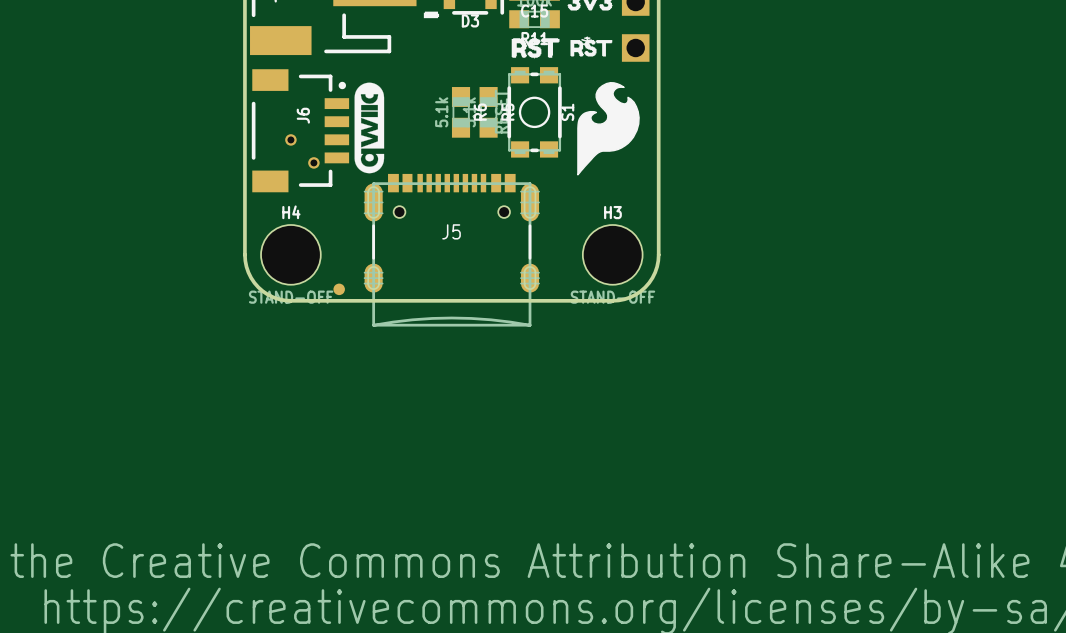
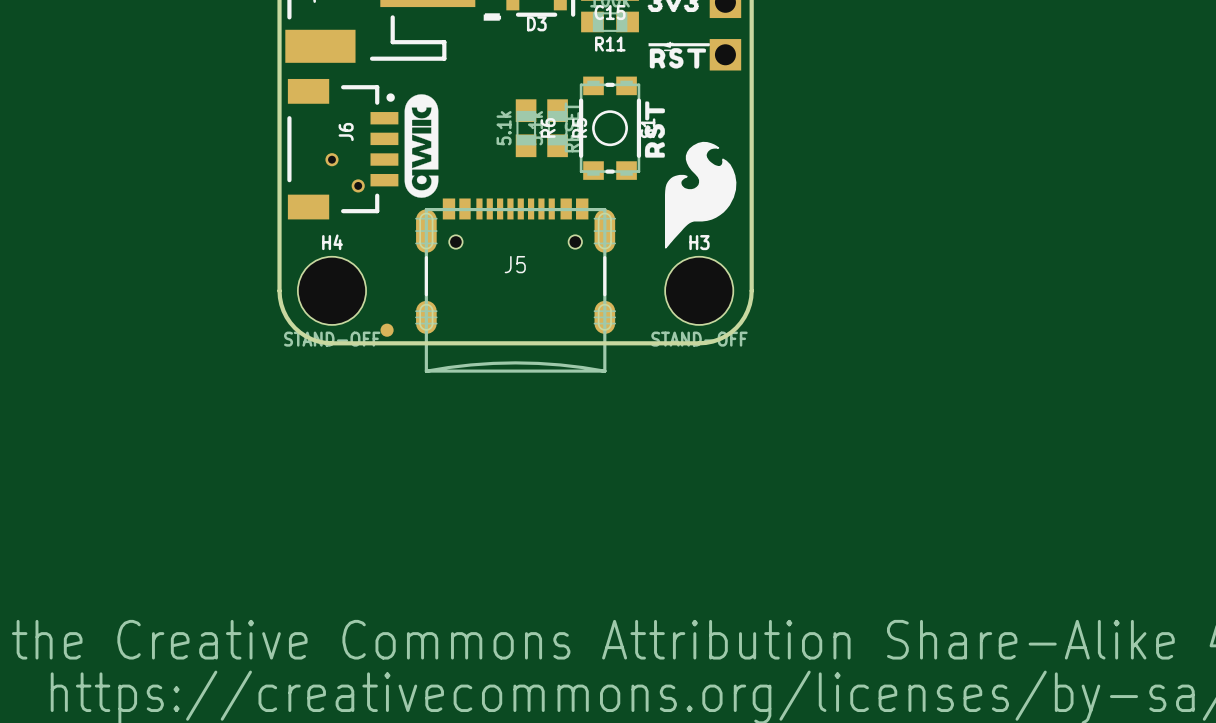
drawing: [511, 38, 560, 59] -> none
drawing shape: [570, 39, 613, 57] -> [648, 43, 710, 69]
drawing: none -> [644, 101, 665, 158]
drawing position: (608, 128) -> (700, 195)

